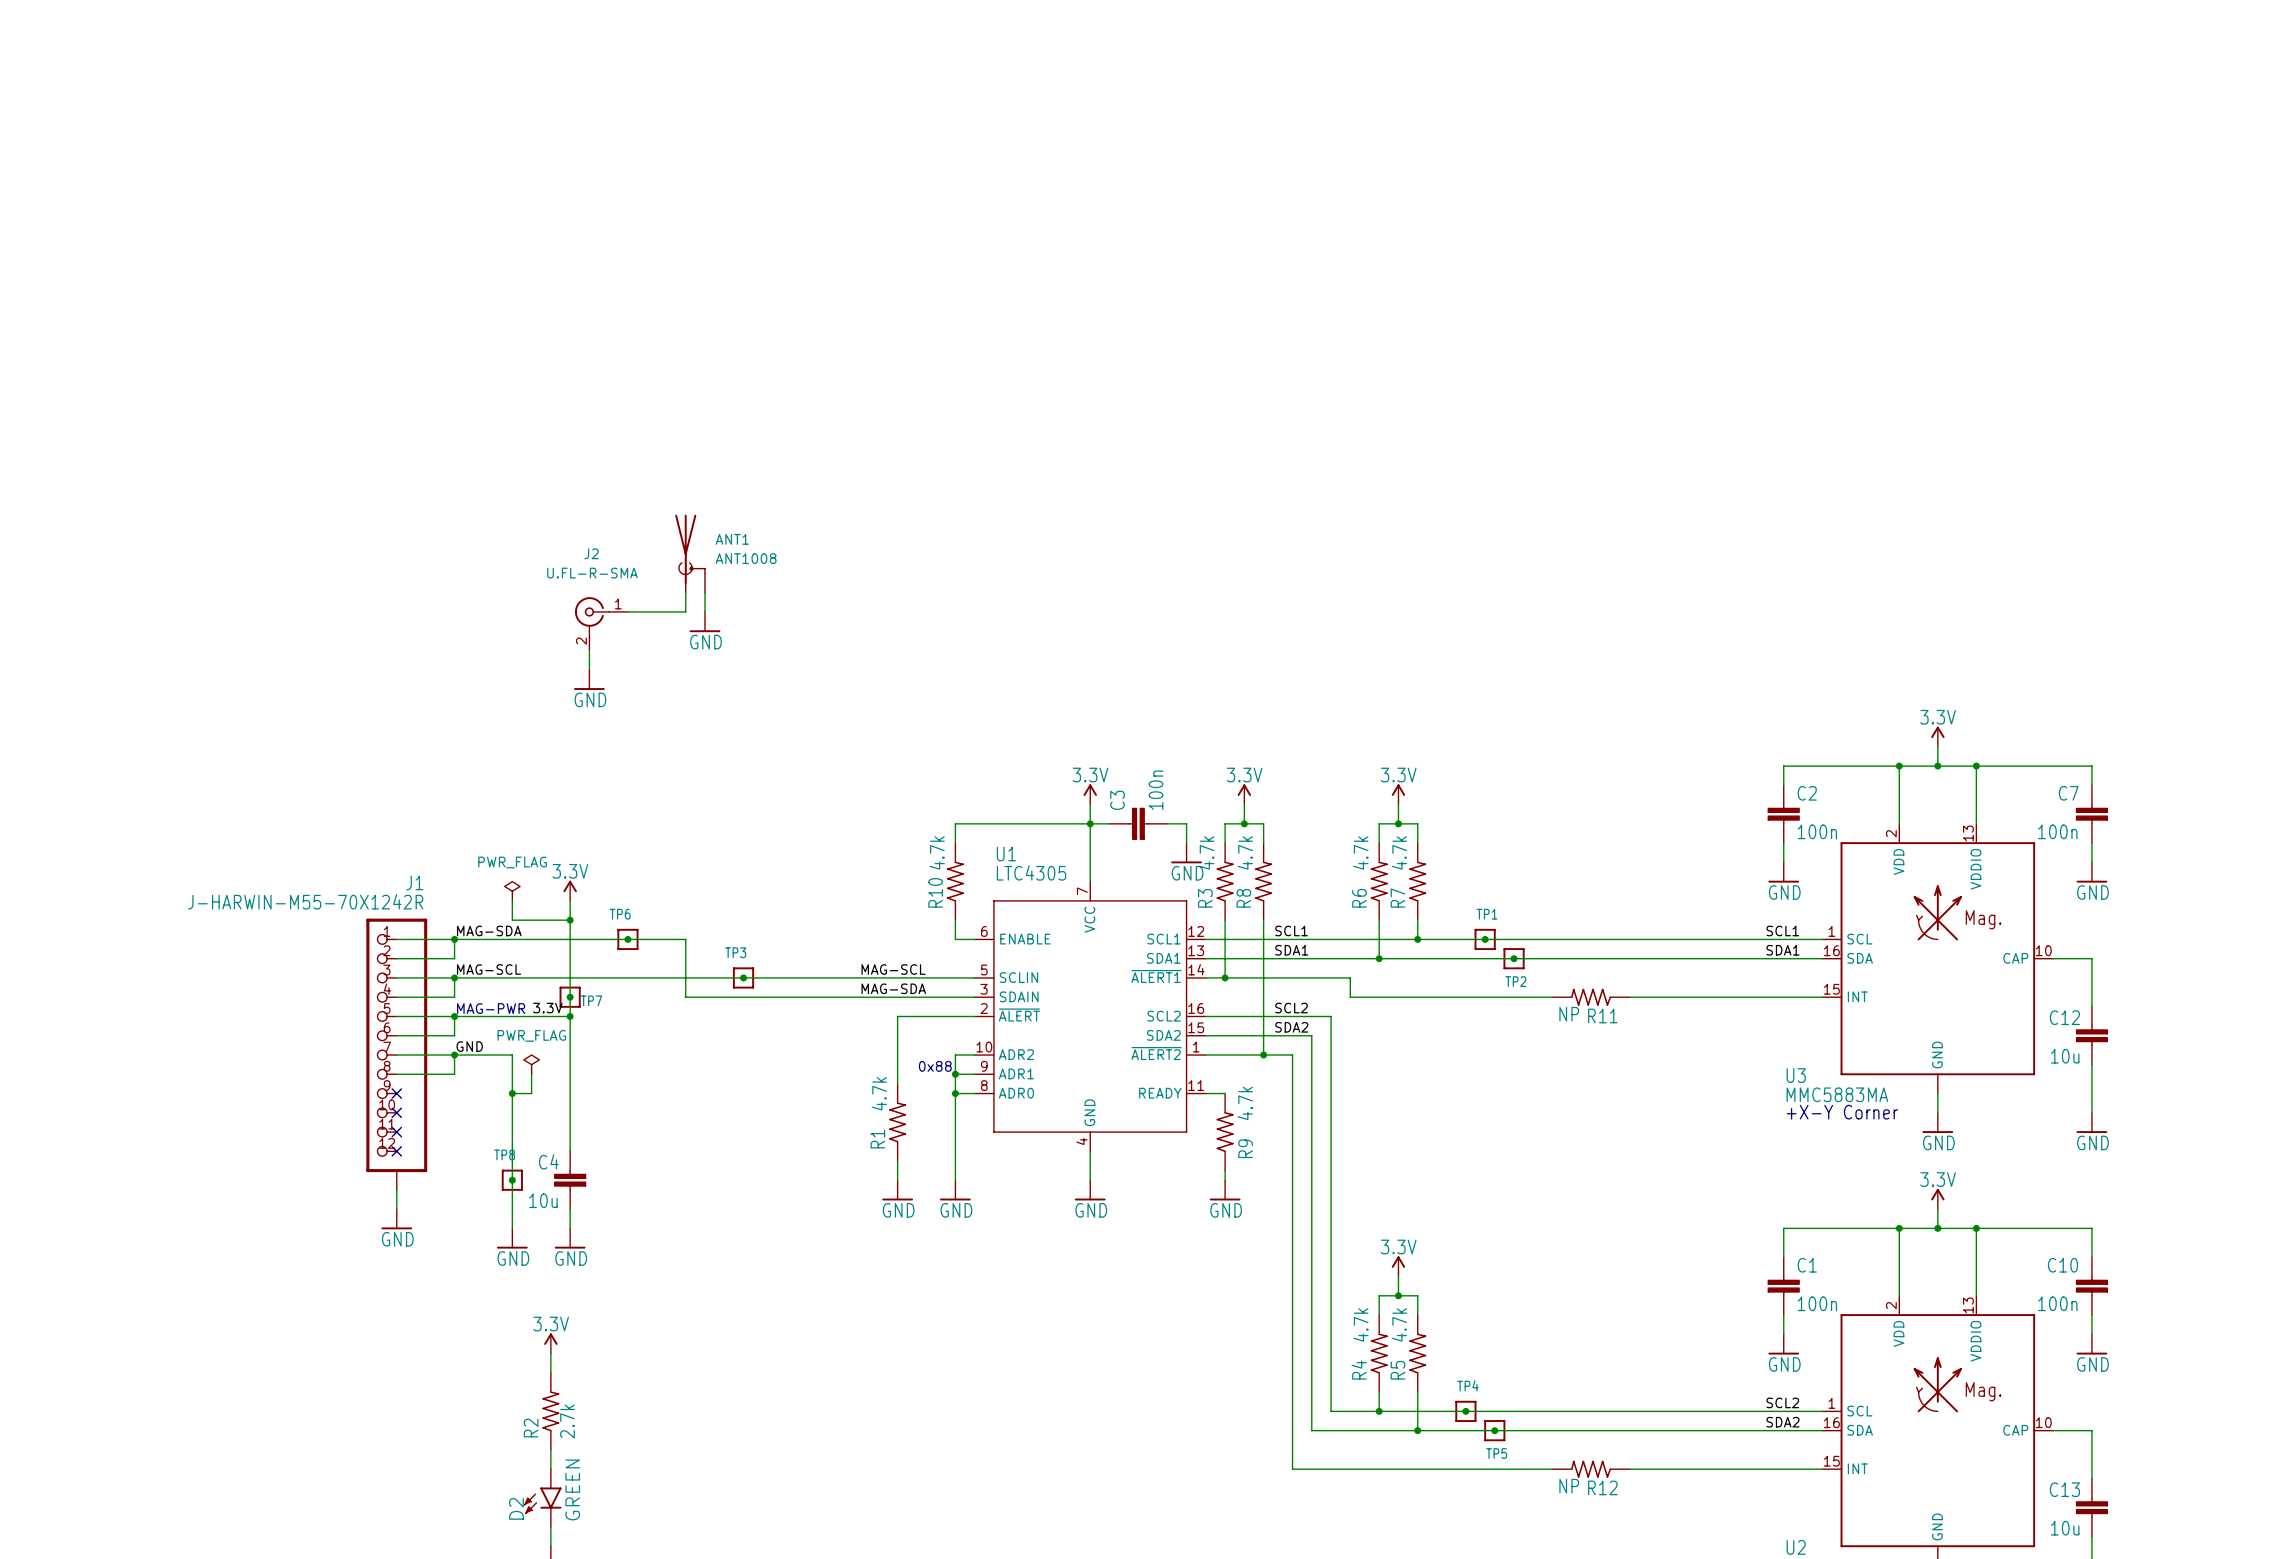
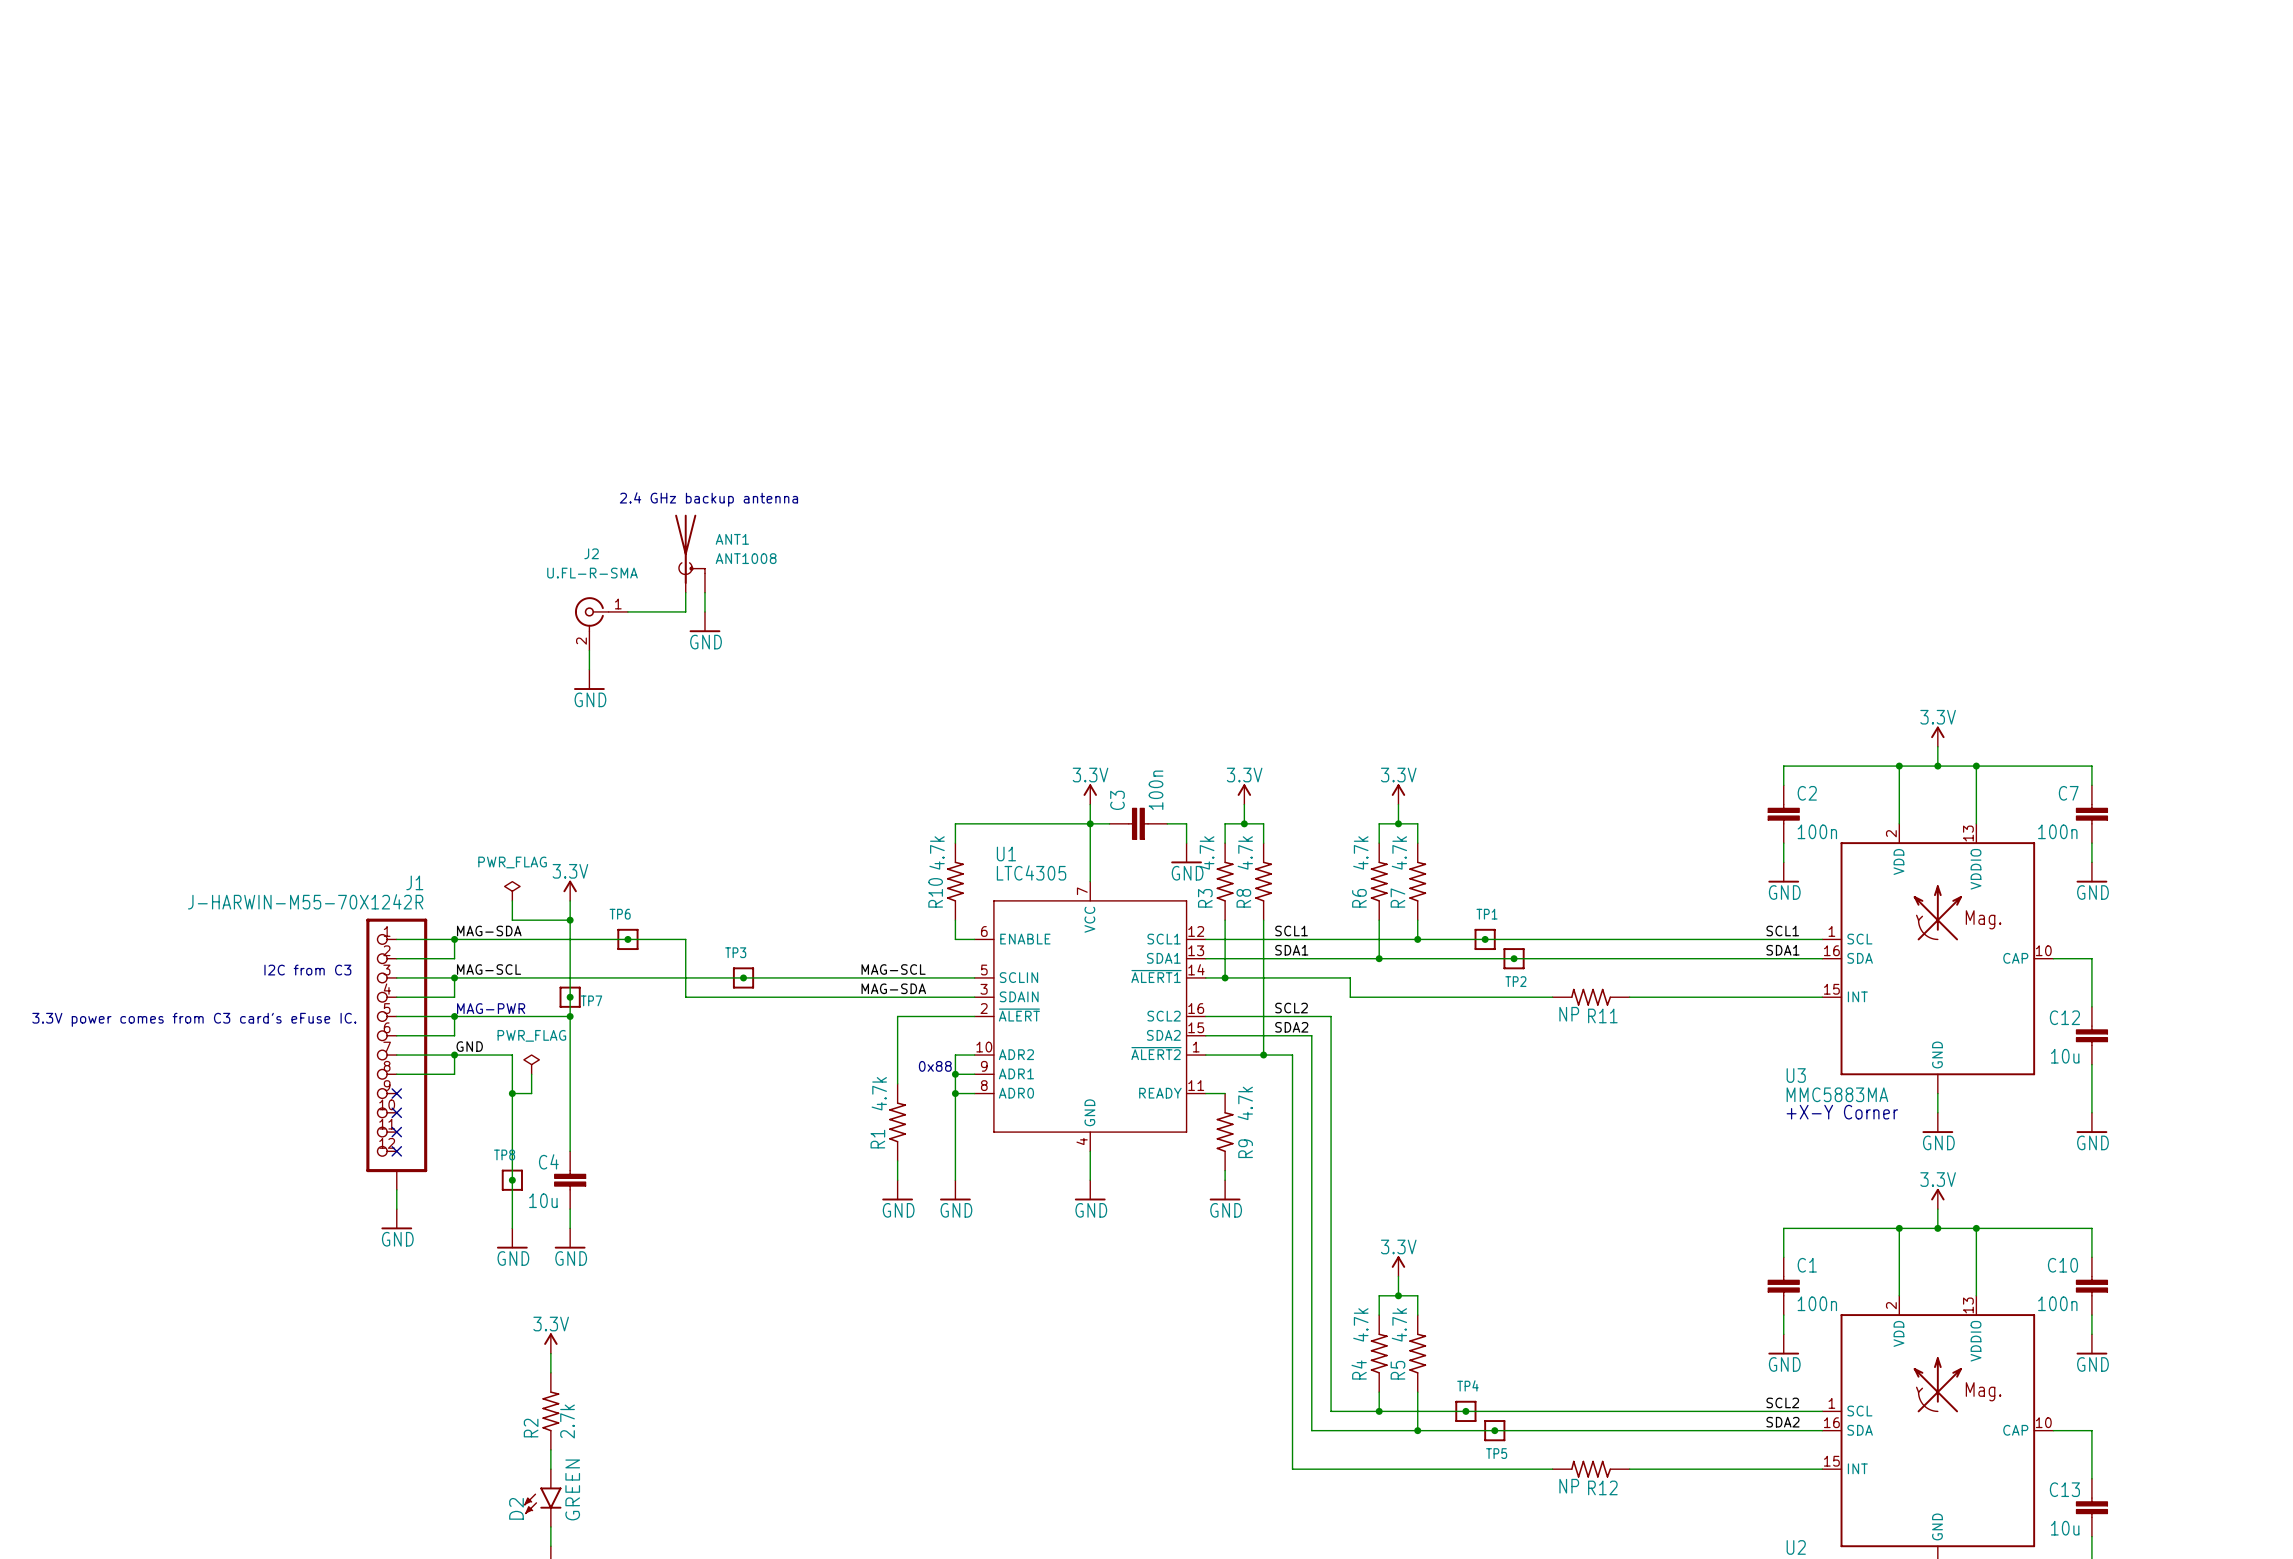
text: none -> 2.4 GHz backup antenna (708, 499)
text: none -> I2C from C3 (307, 970)
label: 3.3V (547, 1008) -> none
text: none -> 3.3V power comes from C3 card's eFuse IC. (194, 1019)

